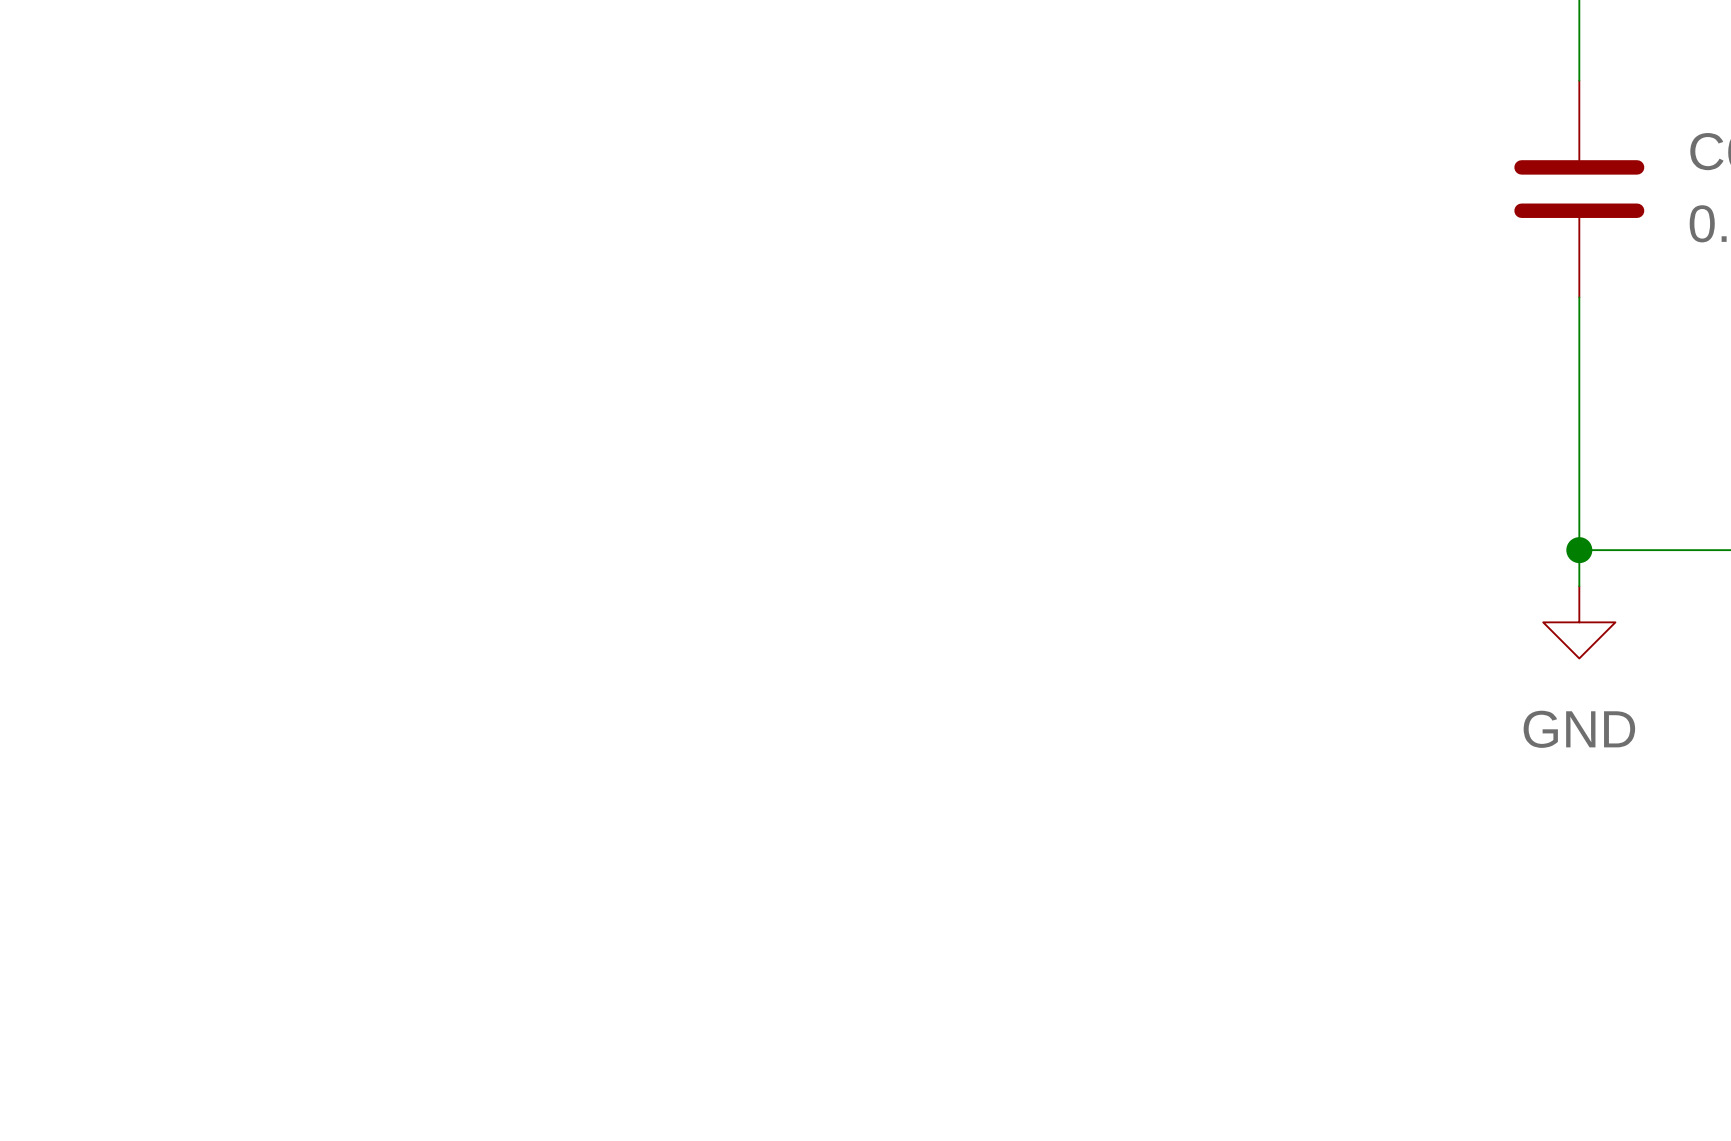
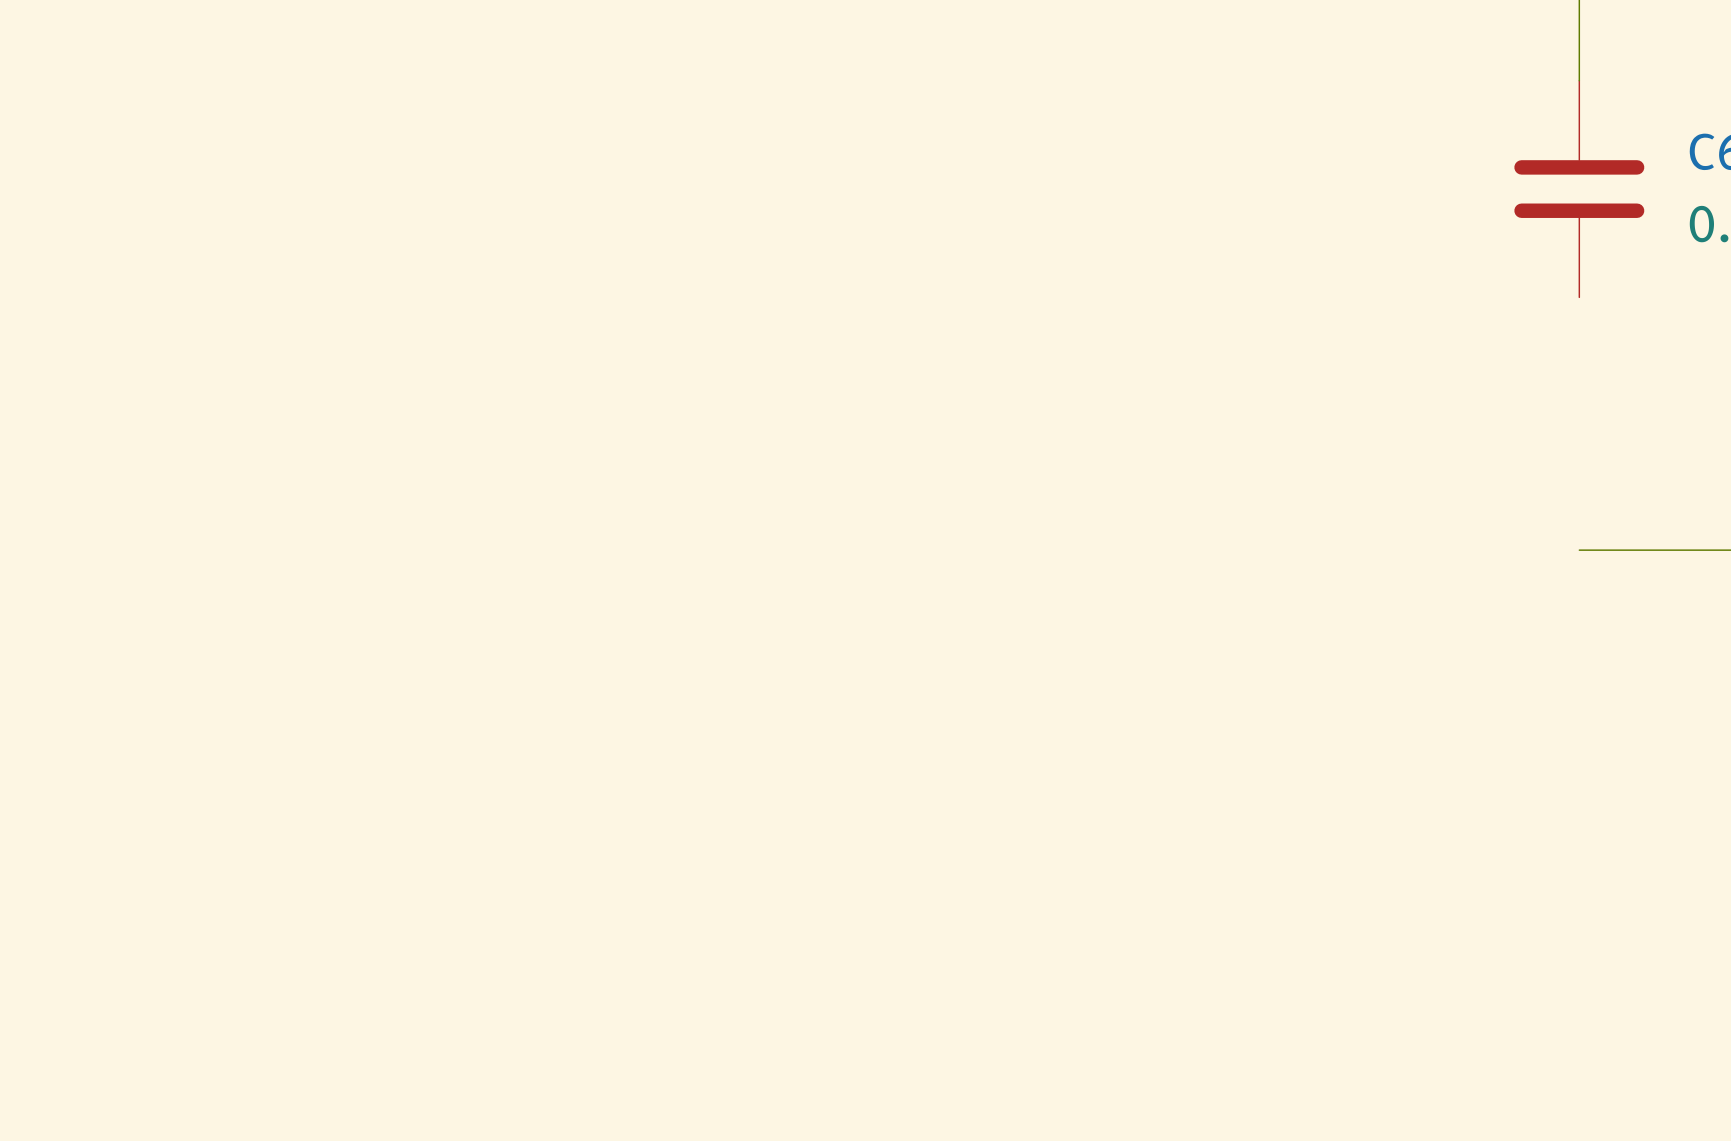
wire: (1579, 297) (1579, 586) -> none
junction: (1579, 550) -> none
power symbol: GND (1579, 622) -> none

